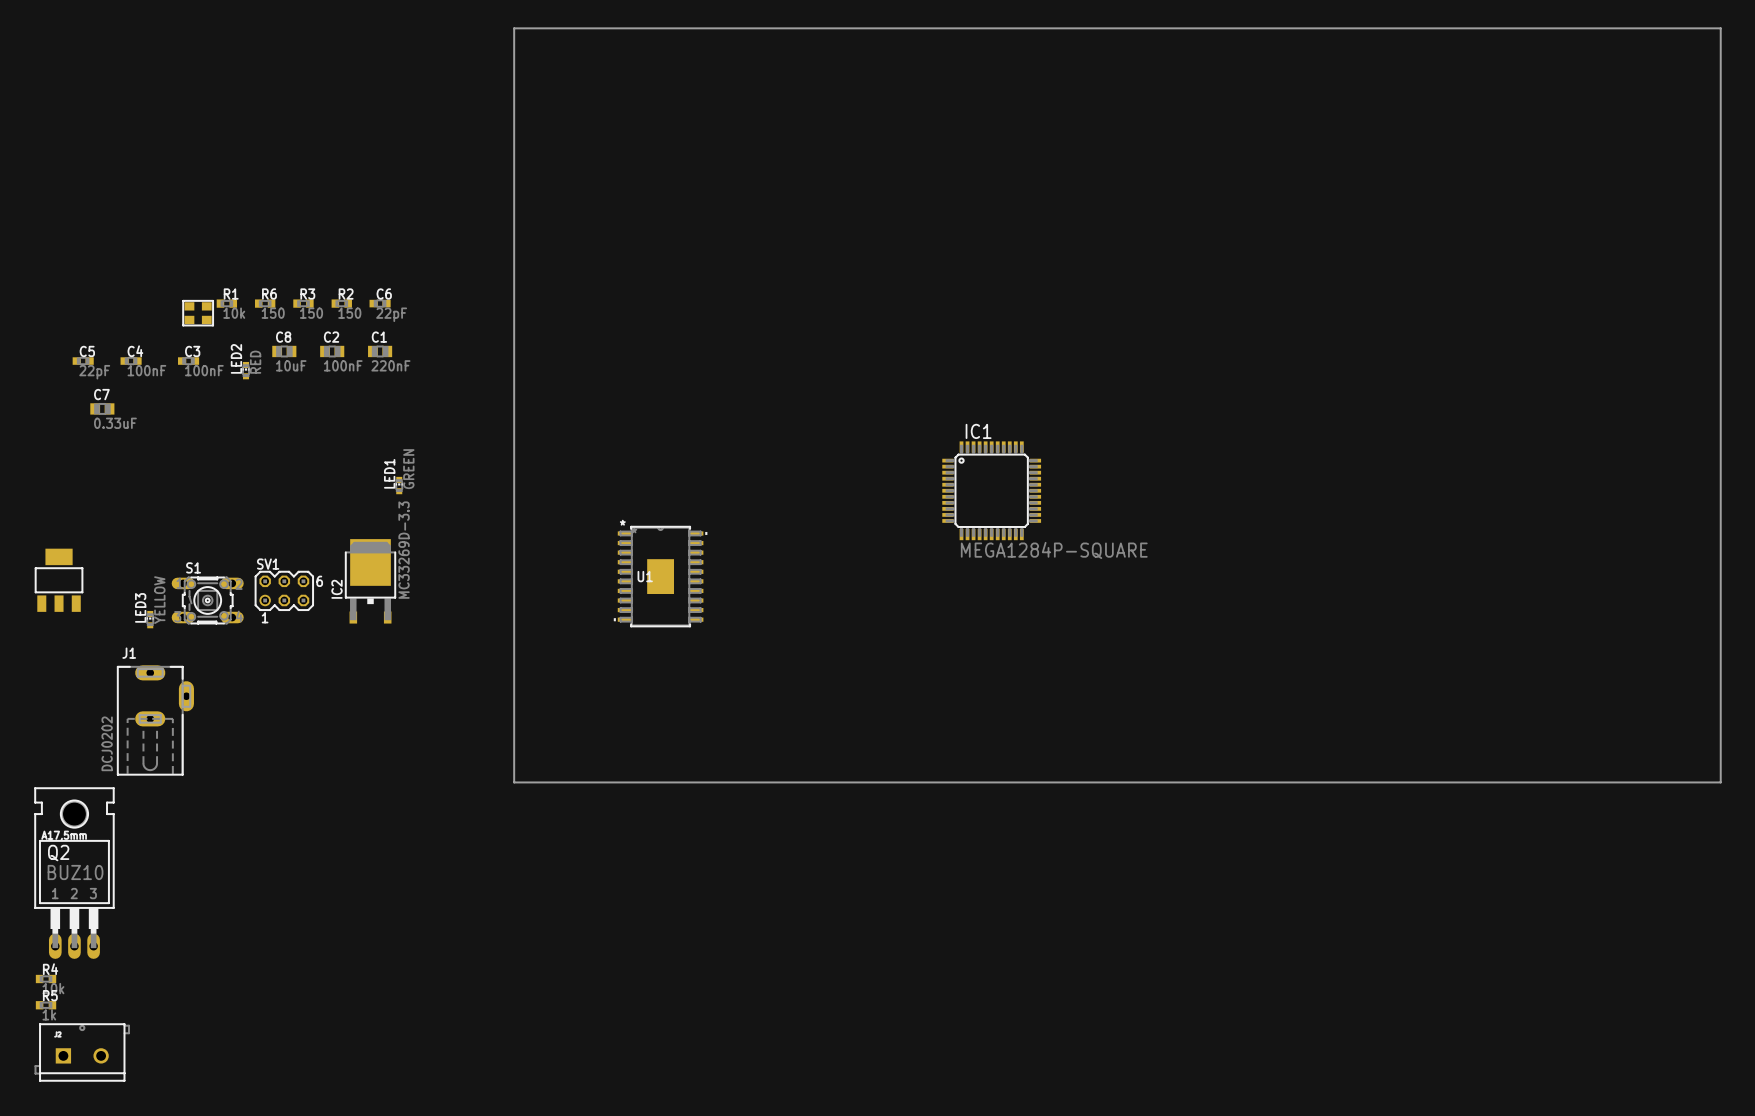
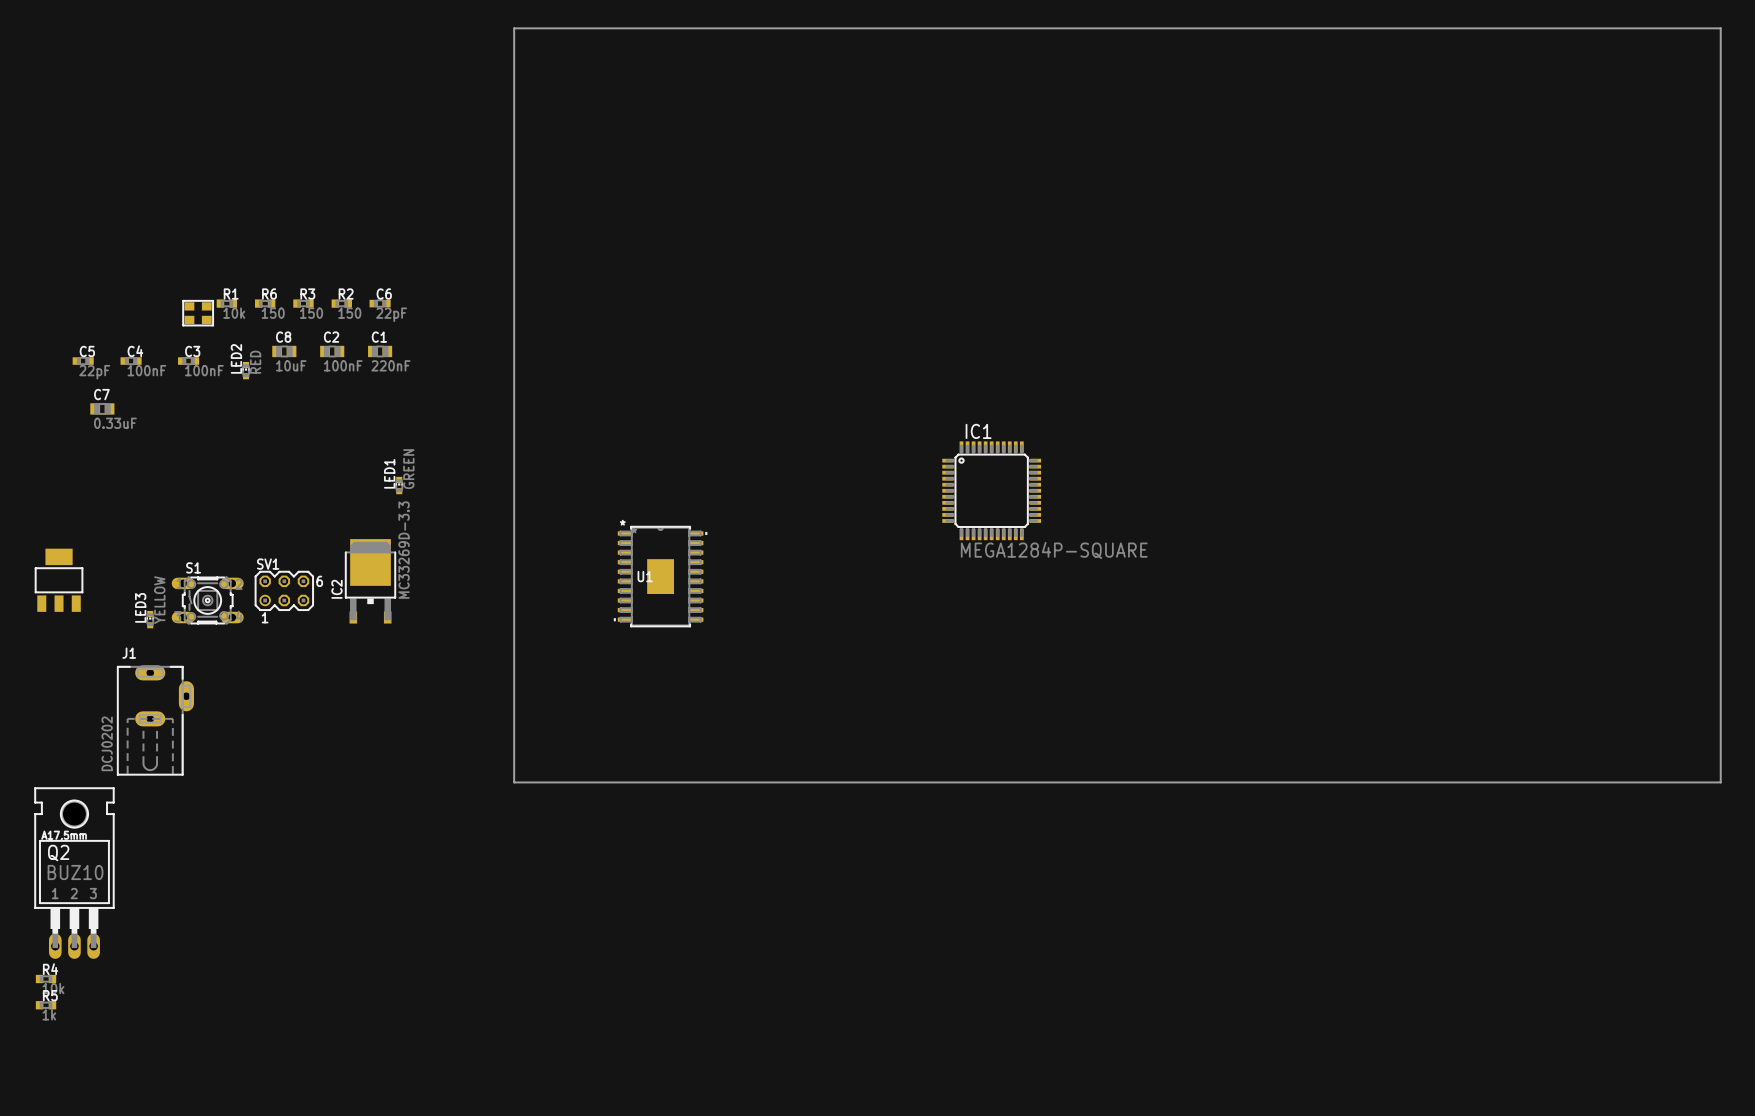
part: (82, 1052) -> none

